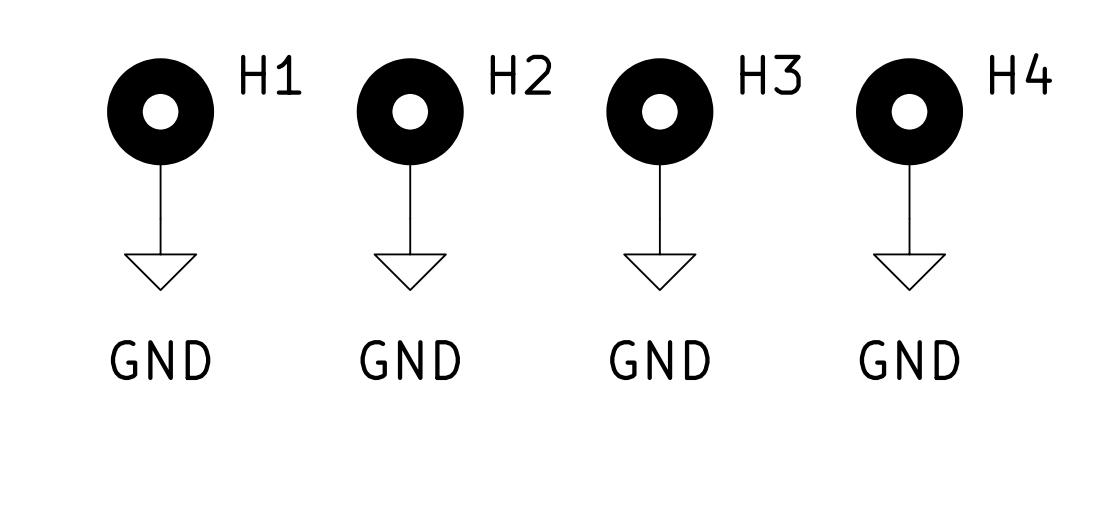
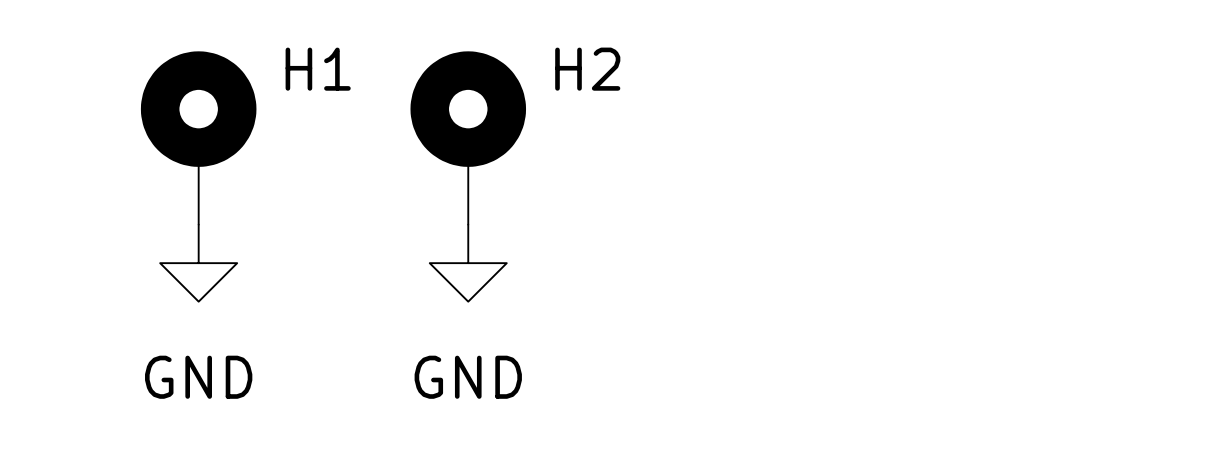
H3: (659, 138) -> none
H4: (909, 138) -> none
power symbol: GND (659, 254) -> none
power symbol: GND (909, 254) -> none

